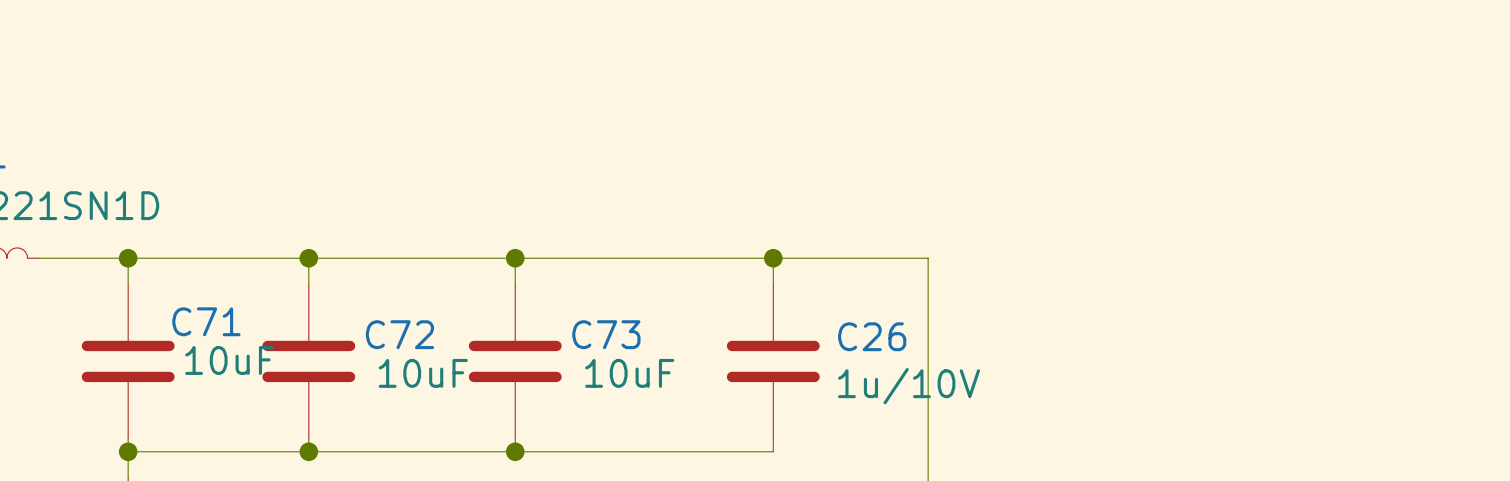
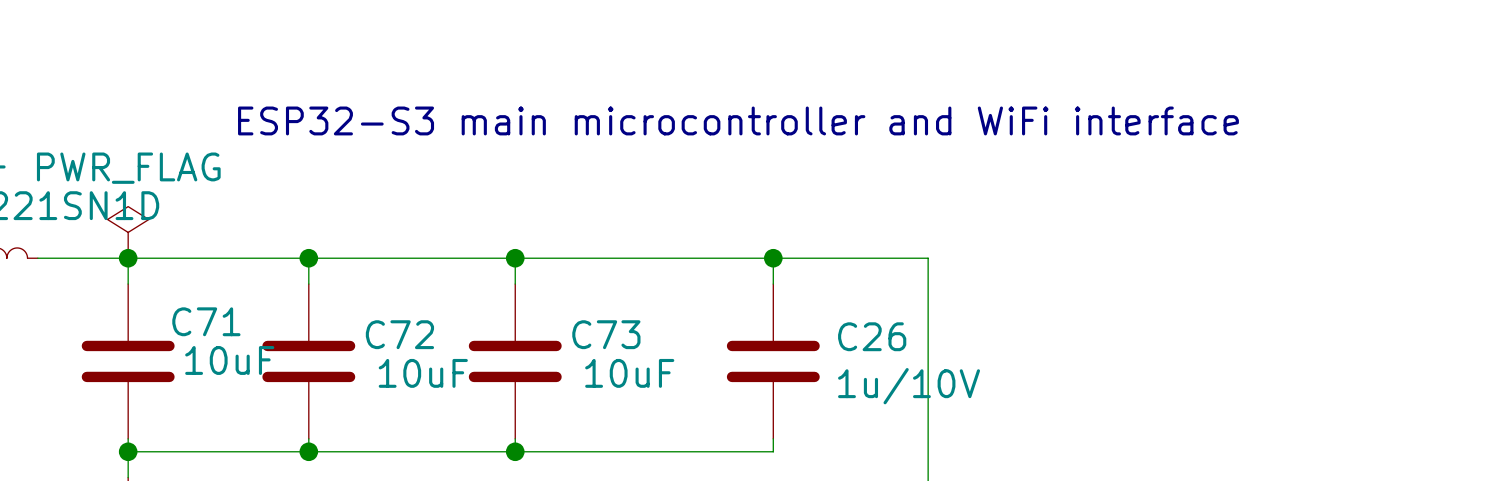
text: none -> ESP32-S3 main microcontroller and WiFi interface (738, 120)
power symbol: none -> PWR_FLAG (128, 232)

